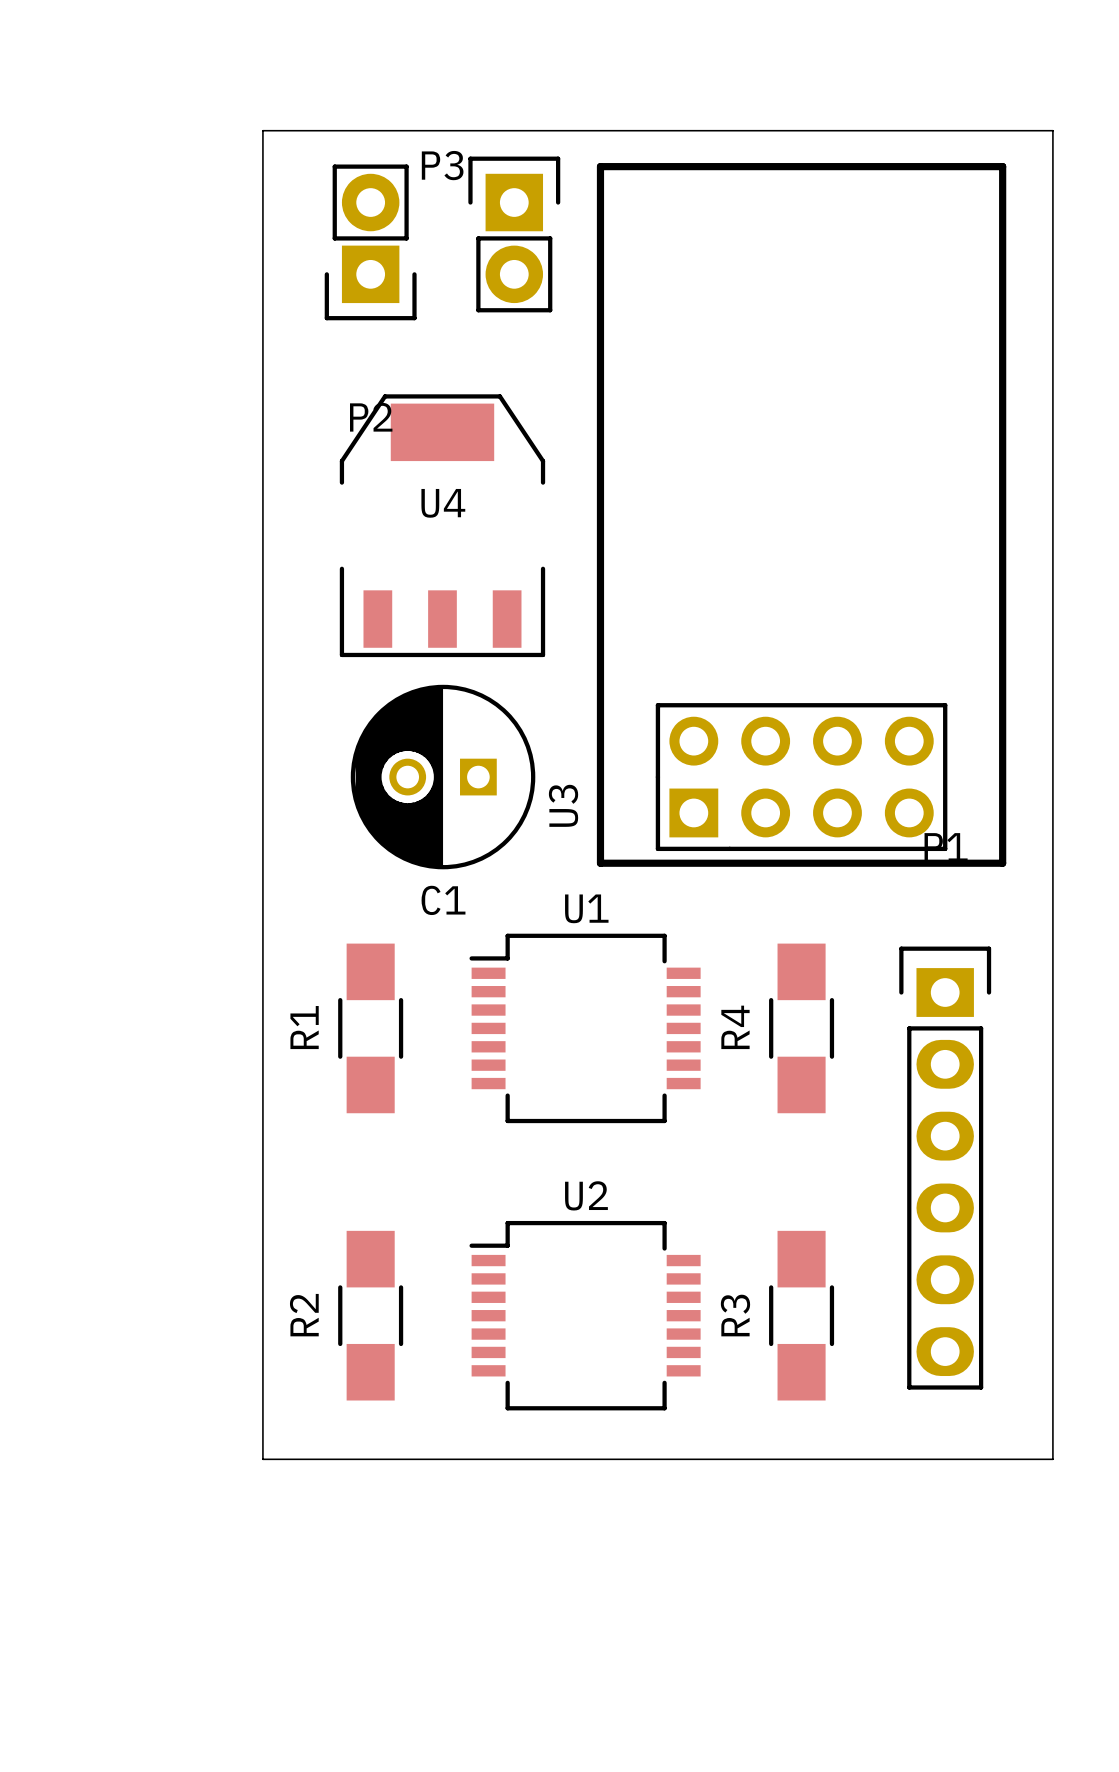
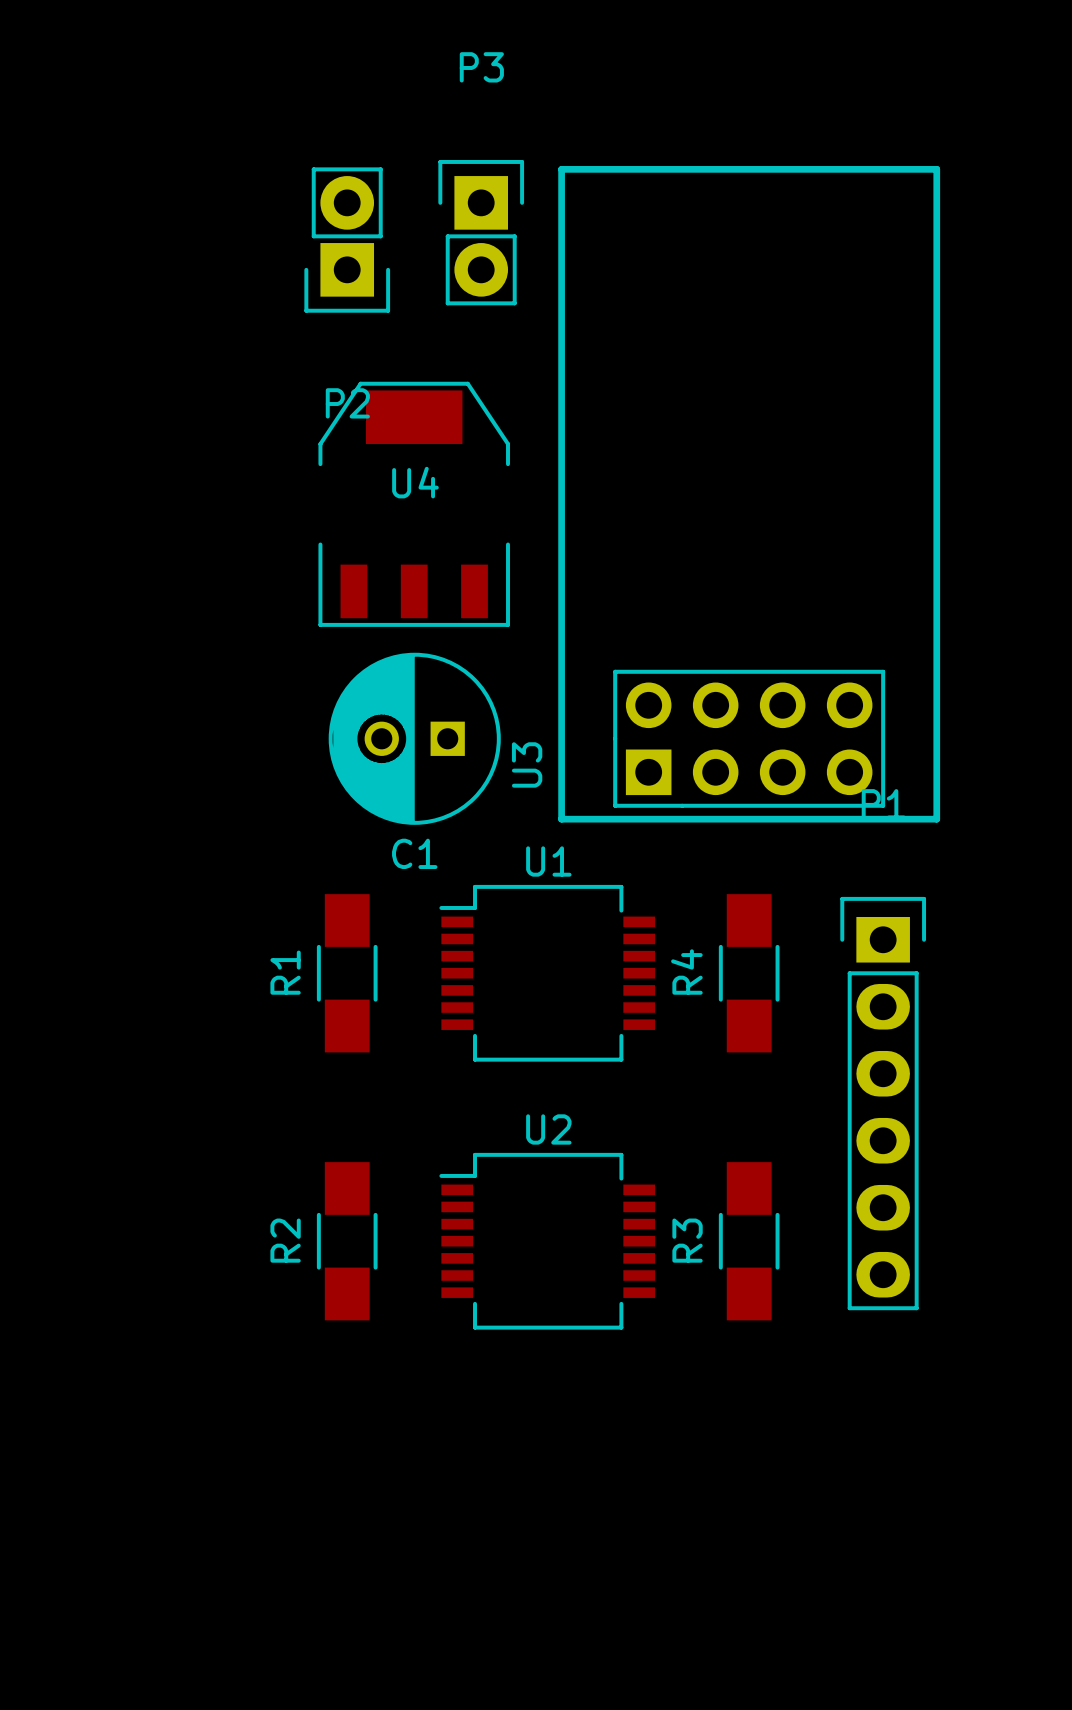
board edge: (262, 130) (262, 1459) (1052, 1459) (1052, 130) (262, 130) -> none
P3 name position: P3 (442, 165) -> P3 (481, 67)

